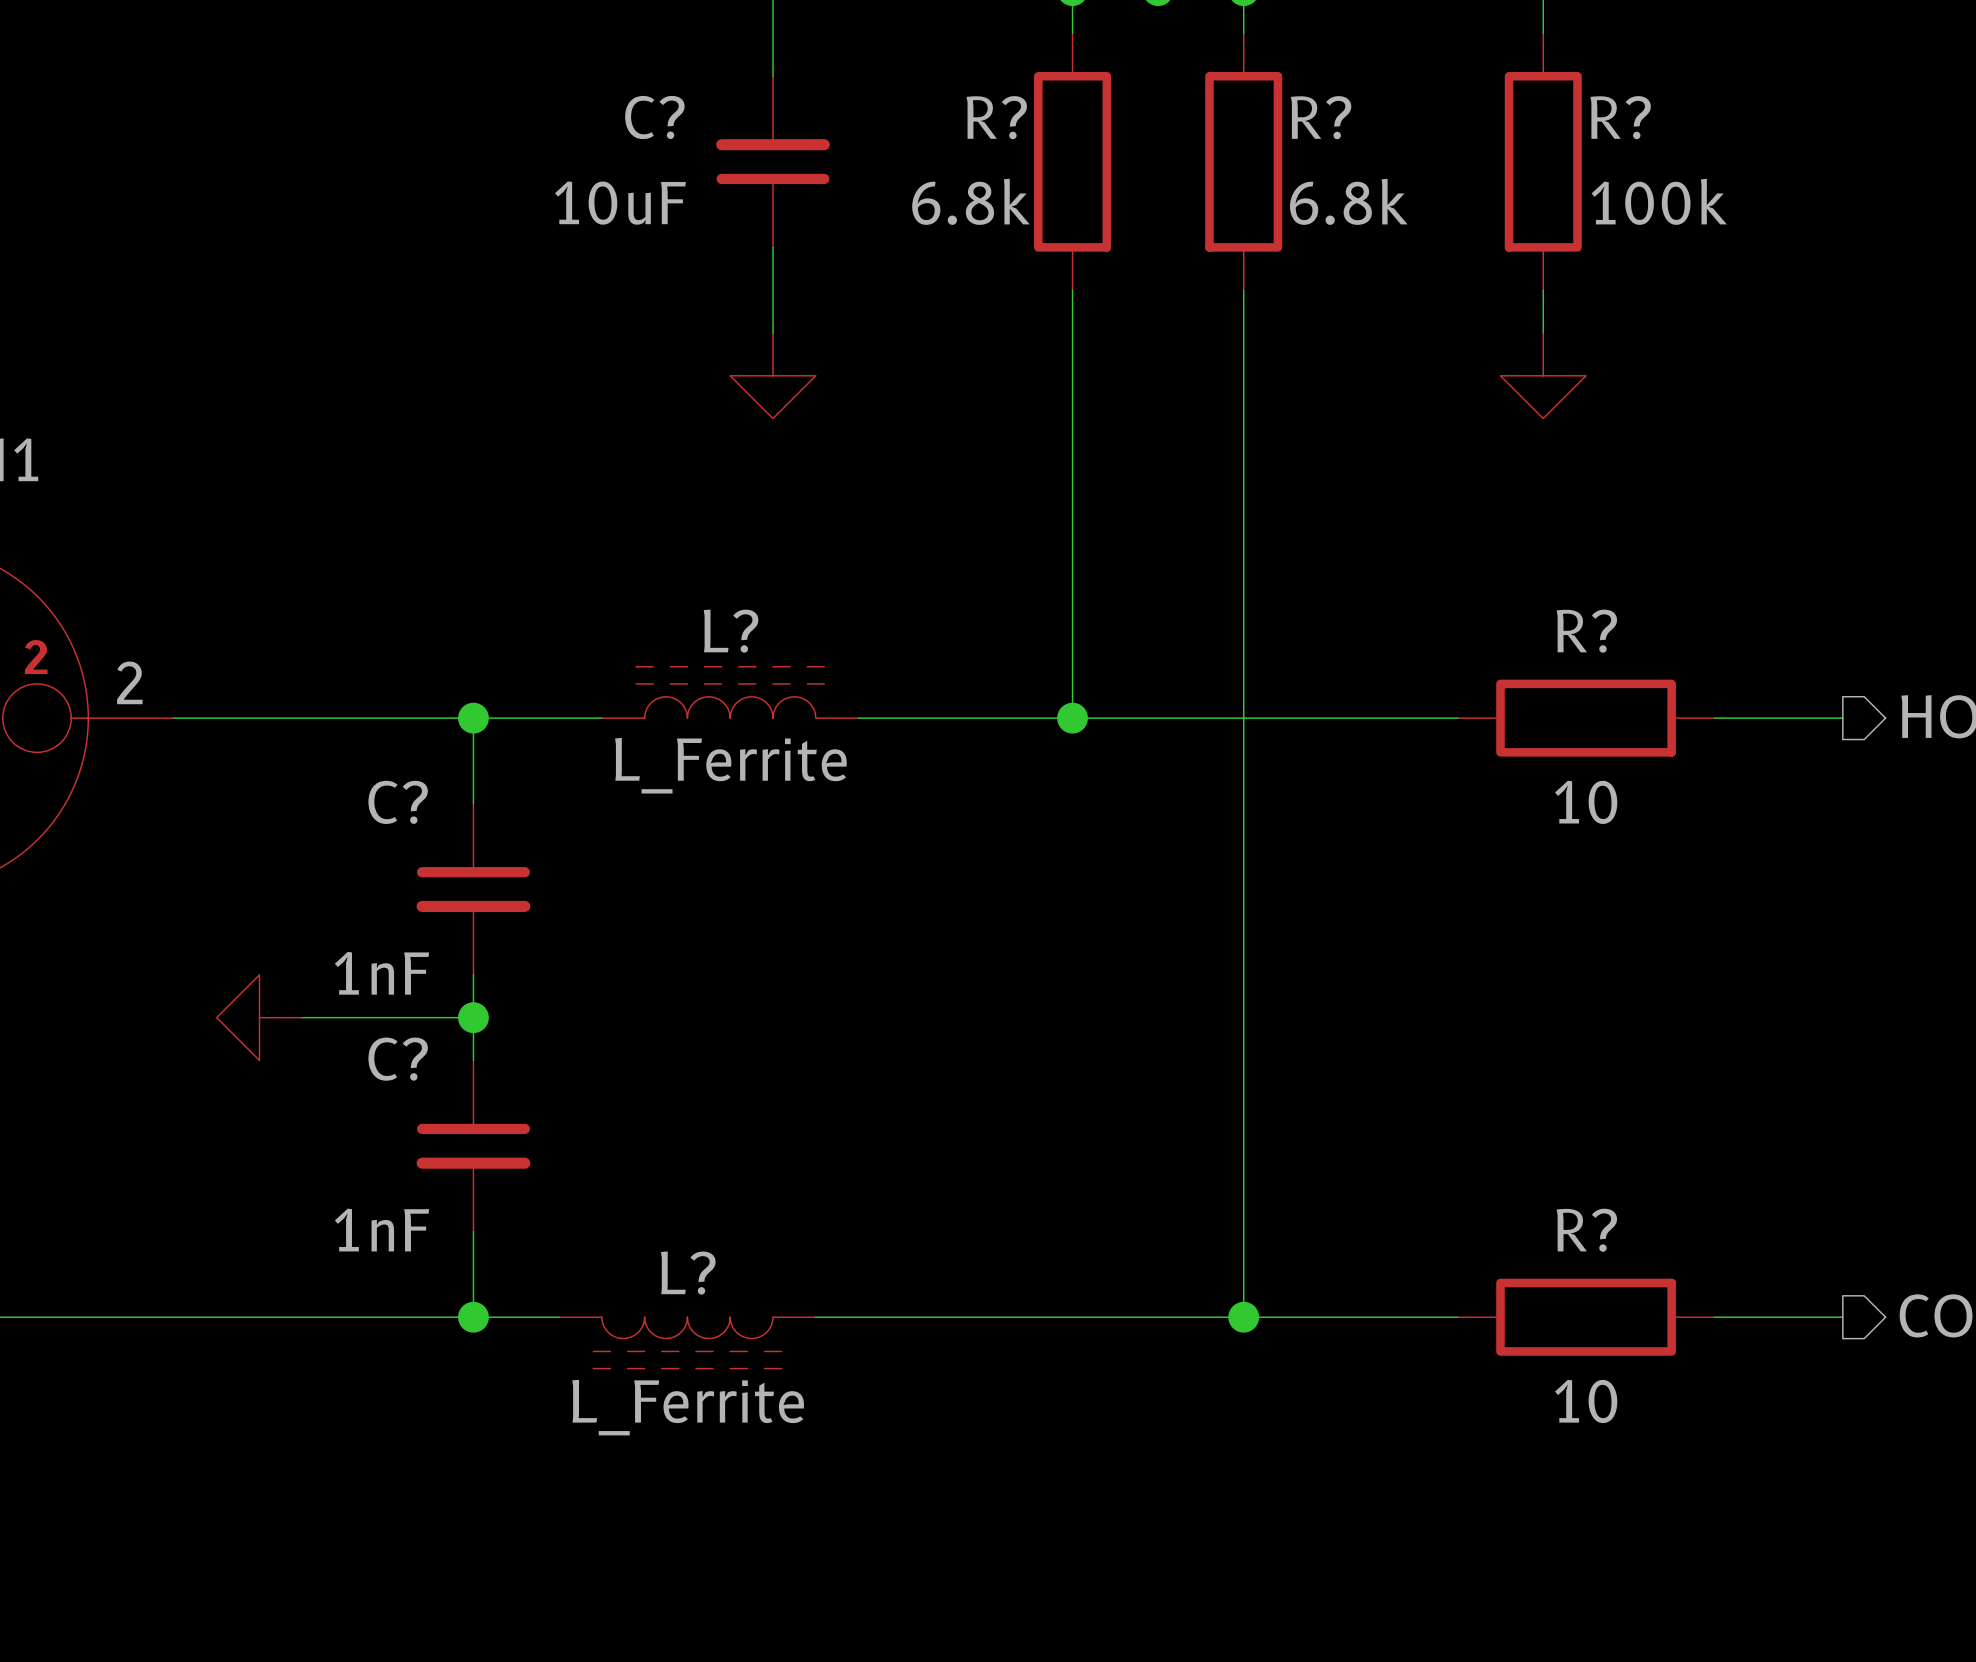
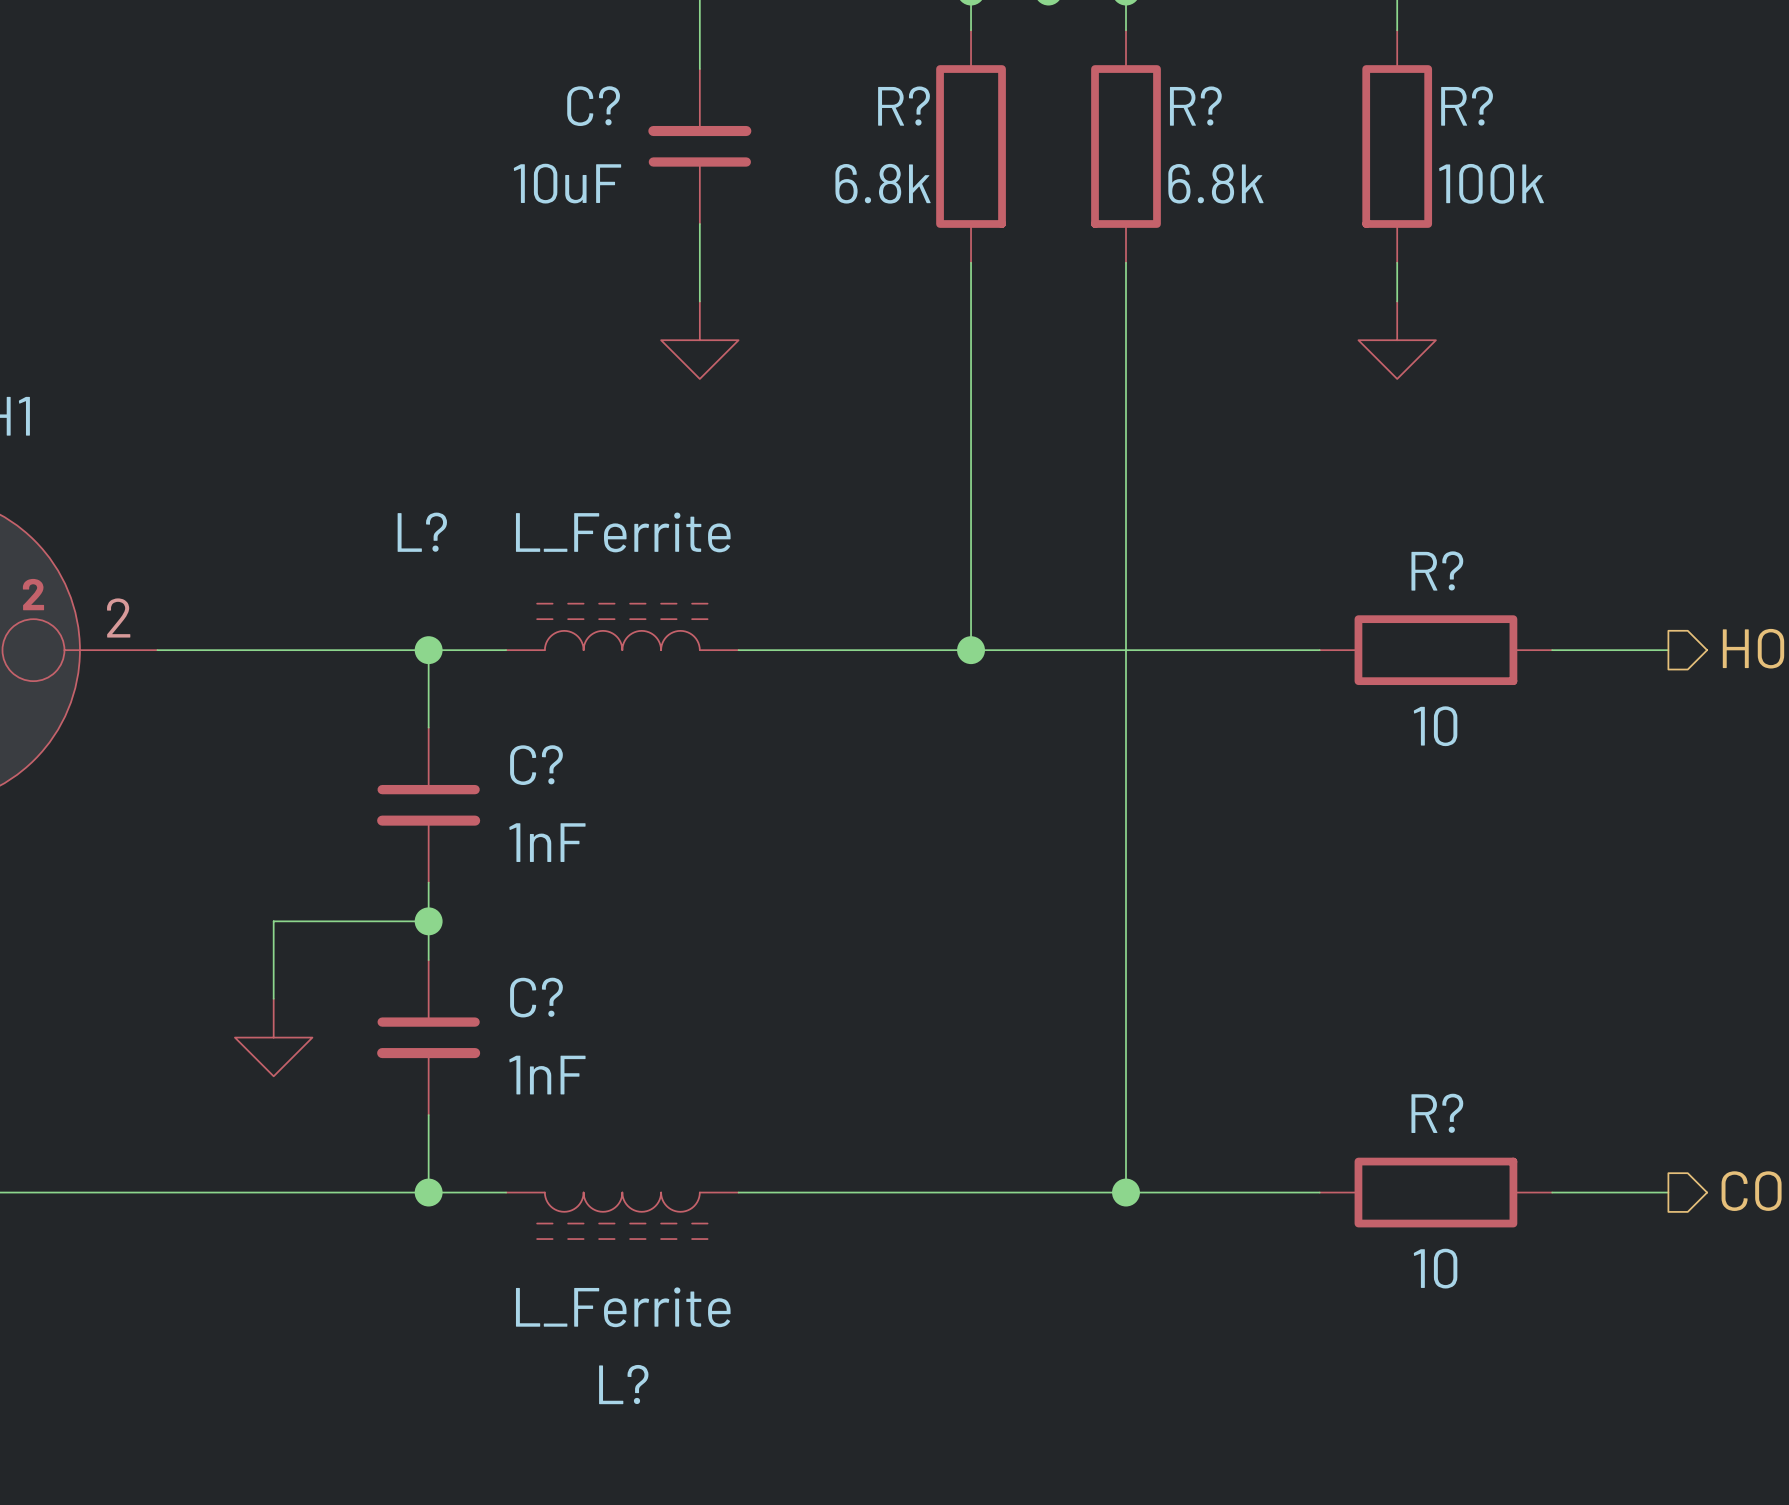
L? name position: L? (731, 631) -> L? (422, 532)
L? position: (730, 692) -> (622, 626)
L? value position: L_Ferrite (730, 765) -> L_Ferrite (623, 532)
C? name position: C? (398, 802) -> C? (536, 765)
C? value position: 1nF (381, 973) -> 1nF (547, 842)
power symbol rotation: 0° (259, 1017) -> 90° counterclockwise (273, 1037)
power symbol position: (259, 1017) -> (273, 1037)
wire: none -> (273, 921) (273, 998)
C? name position: C? (398, 1059) -> C? (536, 997)
C? value position: 1nF (381, 1230) -> 1nF (547, 1075)
L? name position: L? (688, 1273) -> L? (623, 1384)
L? value position: L_Ferrite (688, 1407) -> L_Ferrite (623, 1307)

